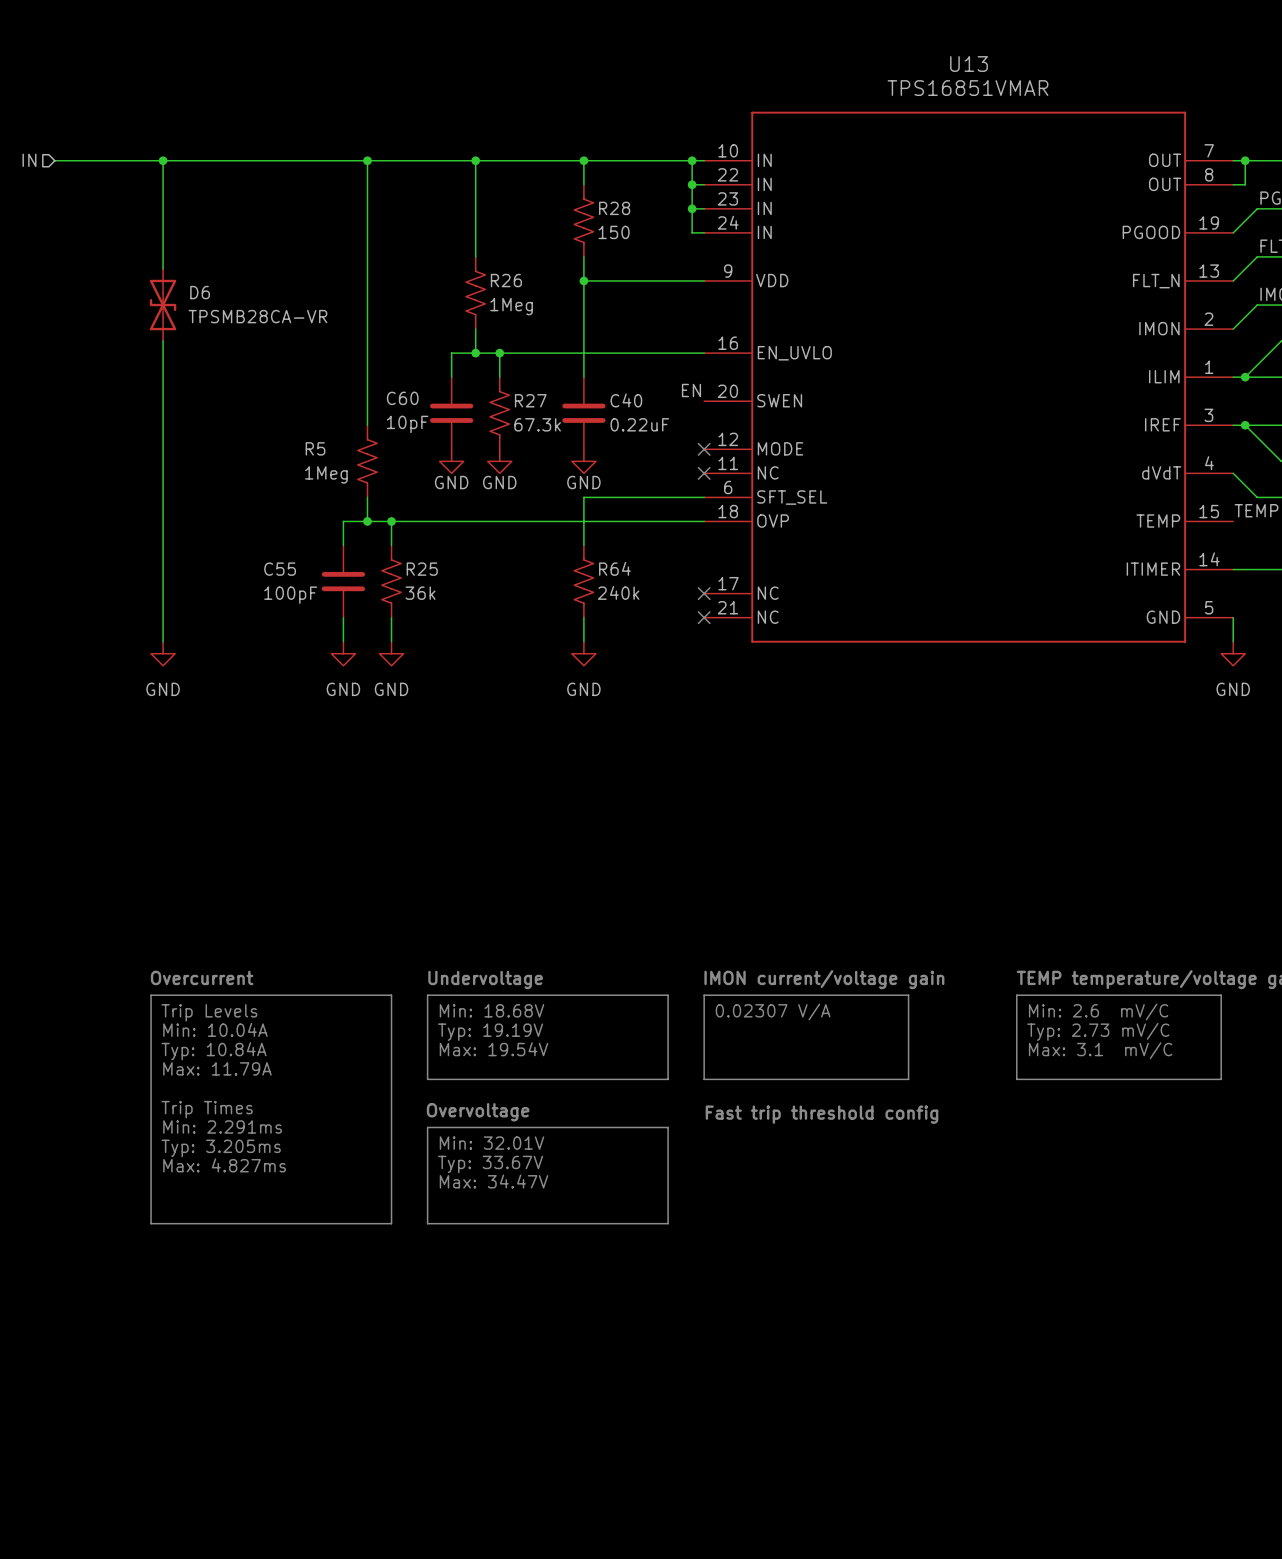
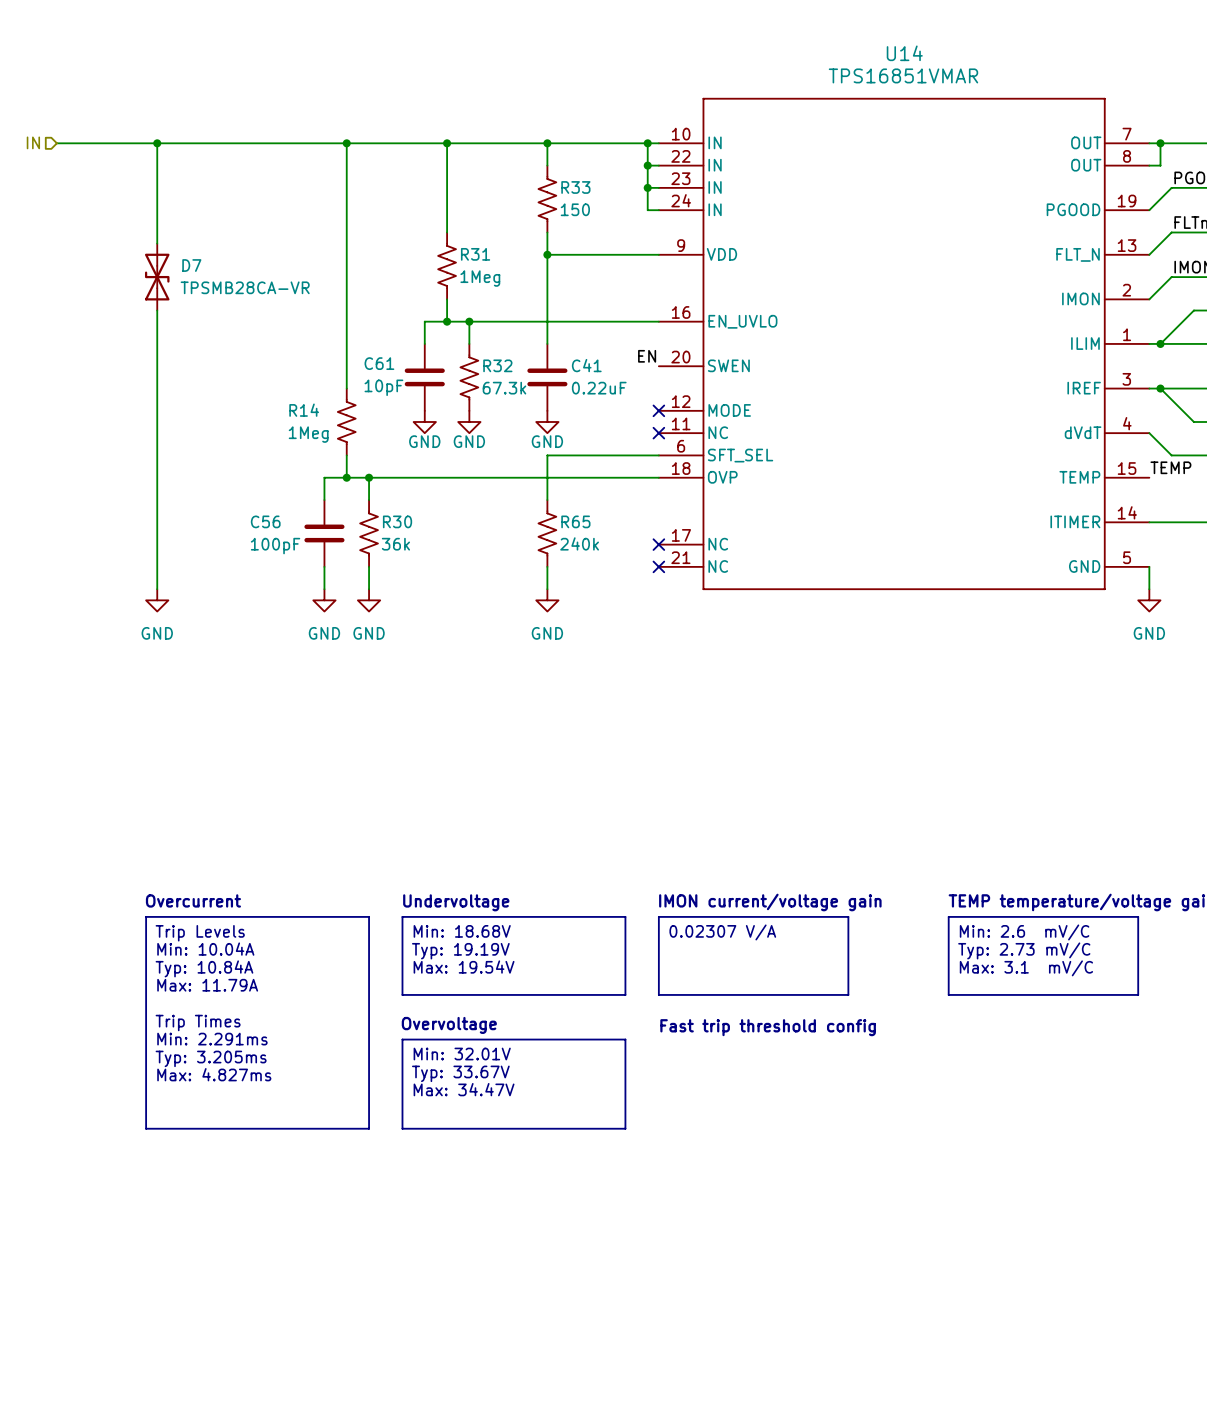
U13 name: U13 (969, 64) -> U14 (904, 53)
R28 name: R28 (614, 208) -> R33 (575, 187)
R26 name: R26 (506, 280) -> R31 (475, 254)
D6 name: D6 (200, 292) -> D7 (191, 265)
C60 name: C60 (402, 398) -> C61 (379, 363)
R27 name: R27 (530, 400) -> R32 (497, 365)
C40 name: C40 (626, 400) -> C41 (586, 365)
R5 name: R5 (315, 448) -> R14 (304, 410)
R64 name: R64 (614, 568) -> R65 (575, 521)
C55 name: C55 (280, 569) -> C56 (265, 521)
R25 name: R25 (422, 569) -> R30 (397, 521)

